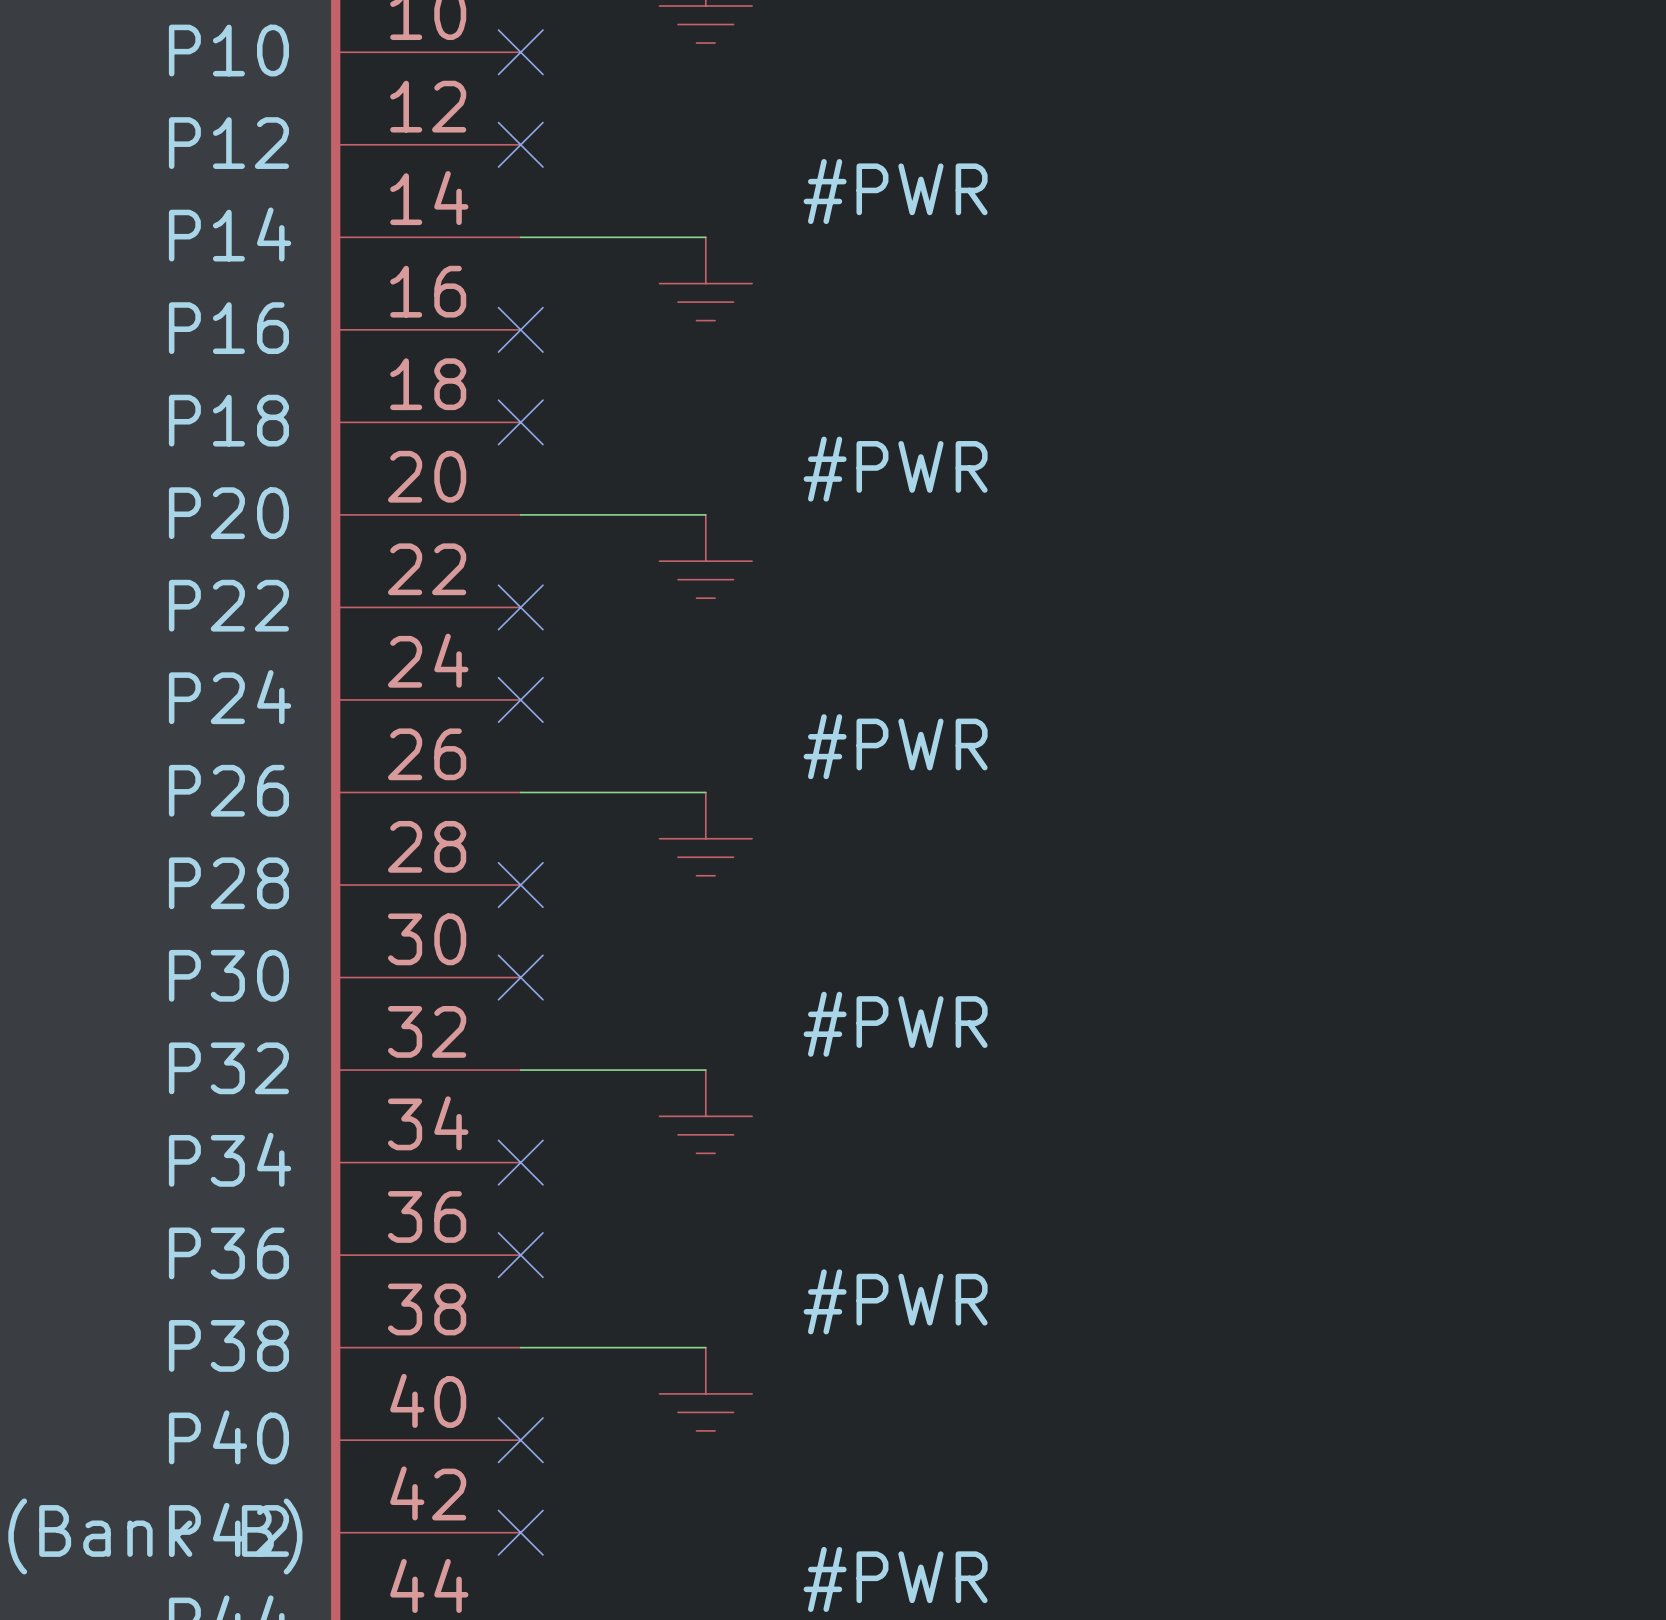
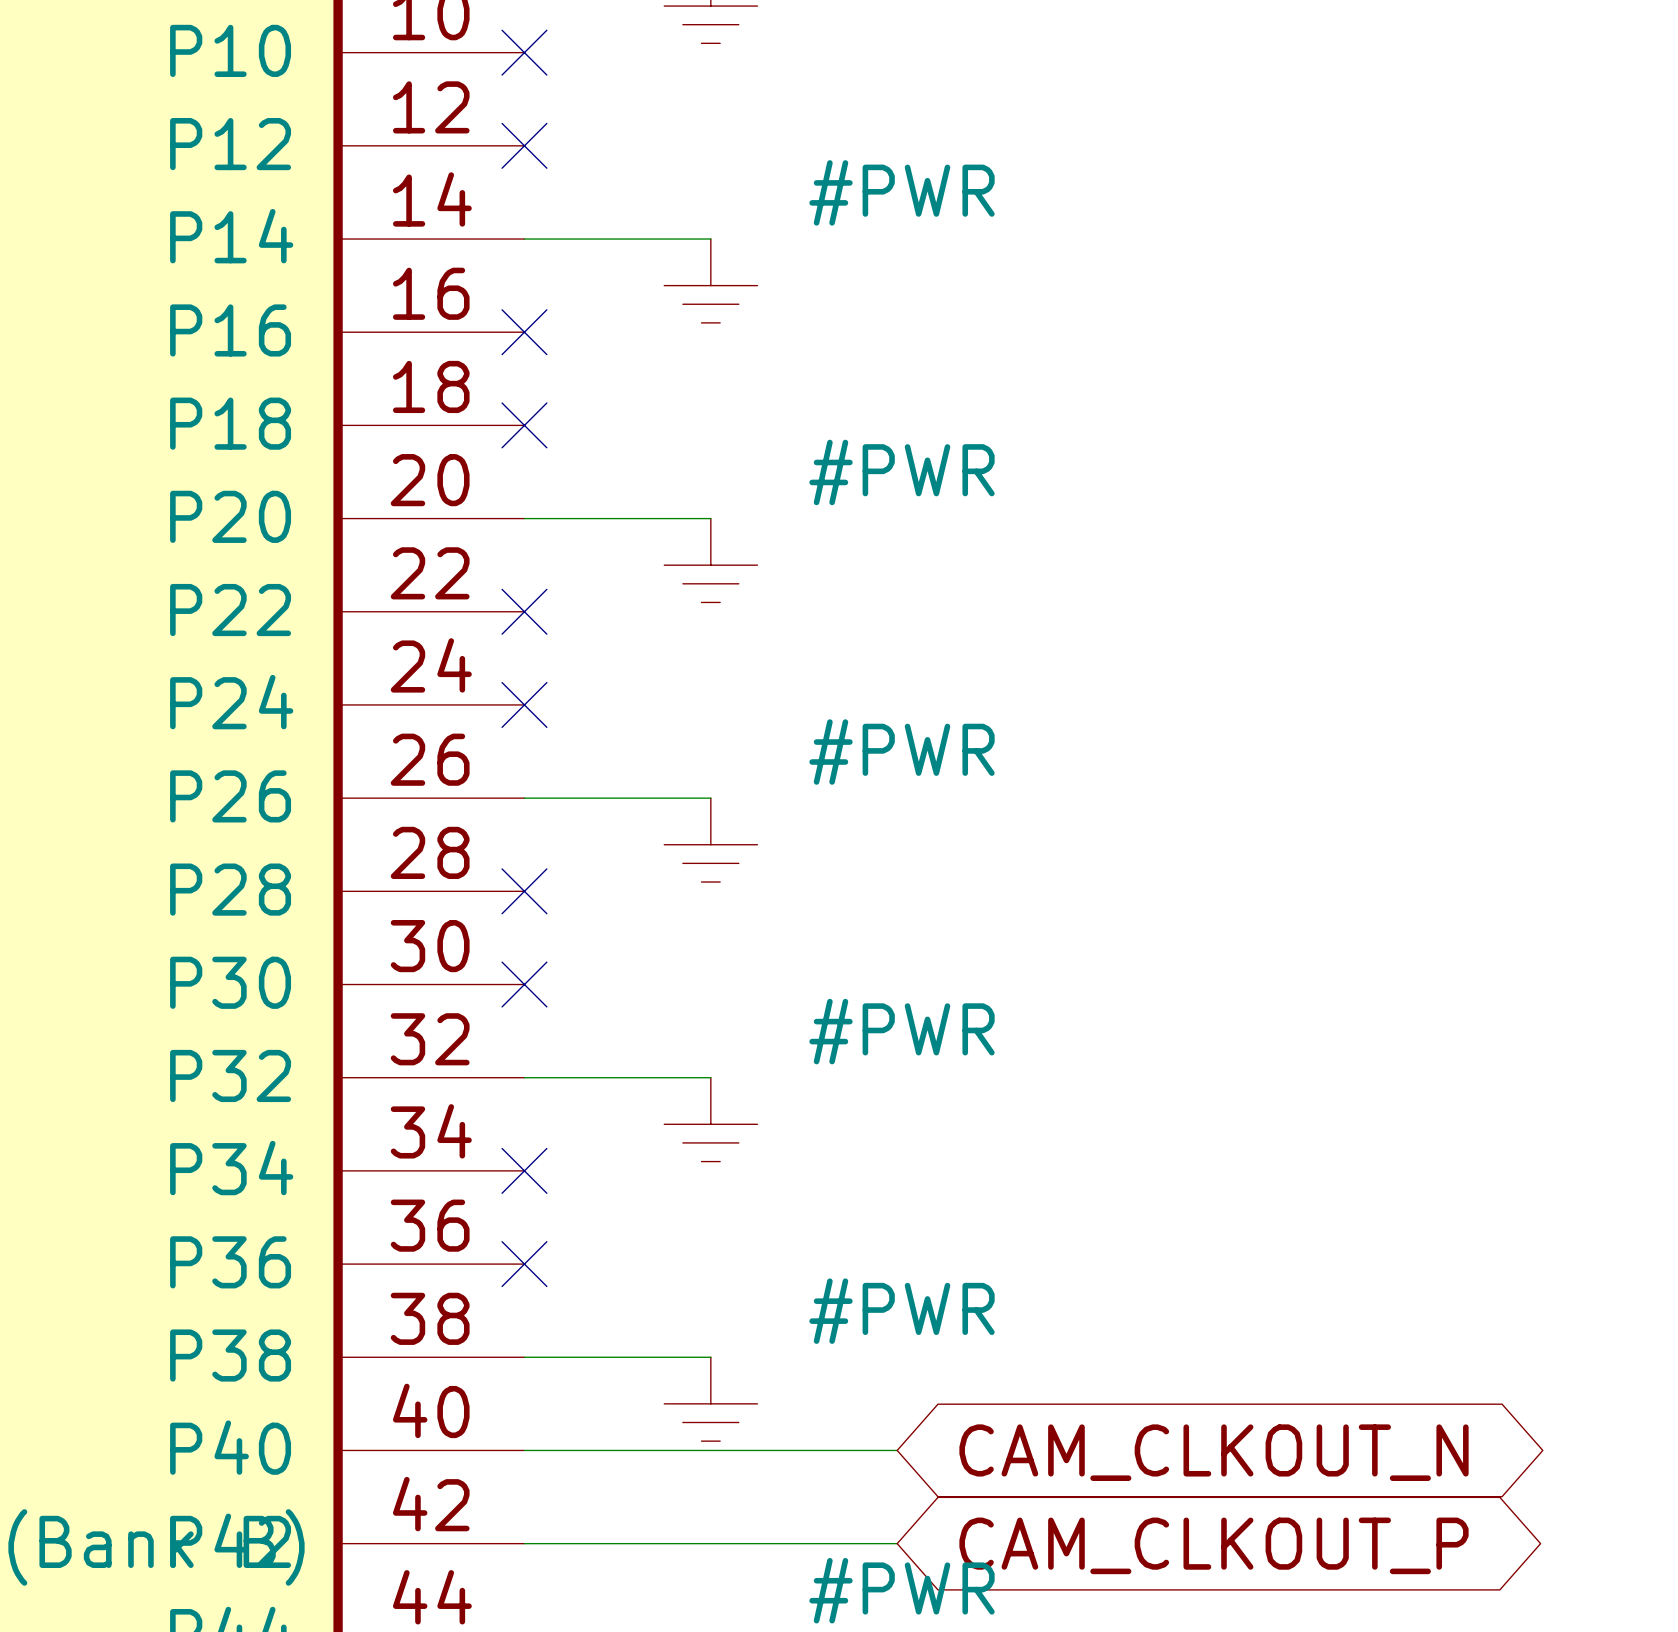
wire: none -> (524, 1450) (897, 1450)
no-connect mark: (520, 1440) -> none
global label: none -> CAM_CLKOUT_N (1214, 1452)
wire: none -> (524, 1543) (897, 1543)
no-connect mark: (520, 1532) -> none
global label: none -> CAM_CLKOUT_P (1214, 1545)

